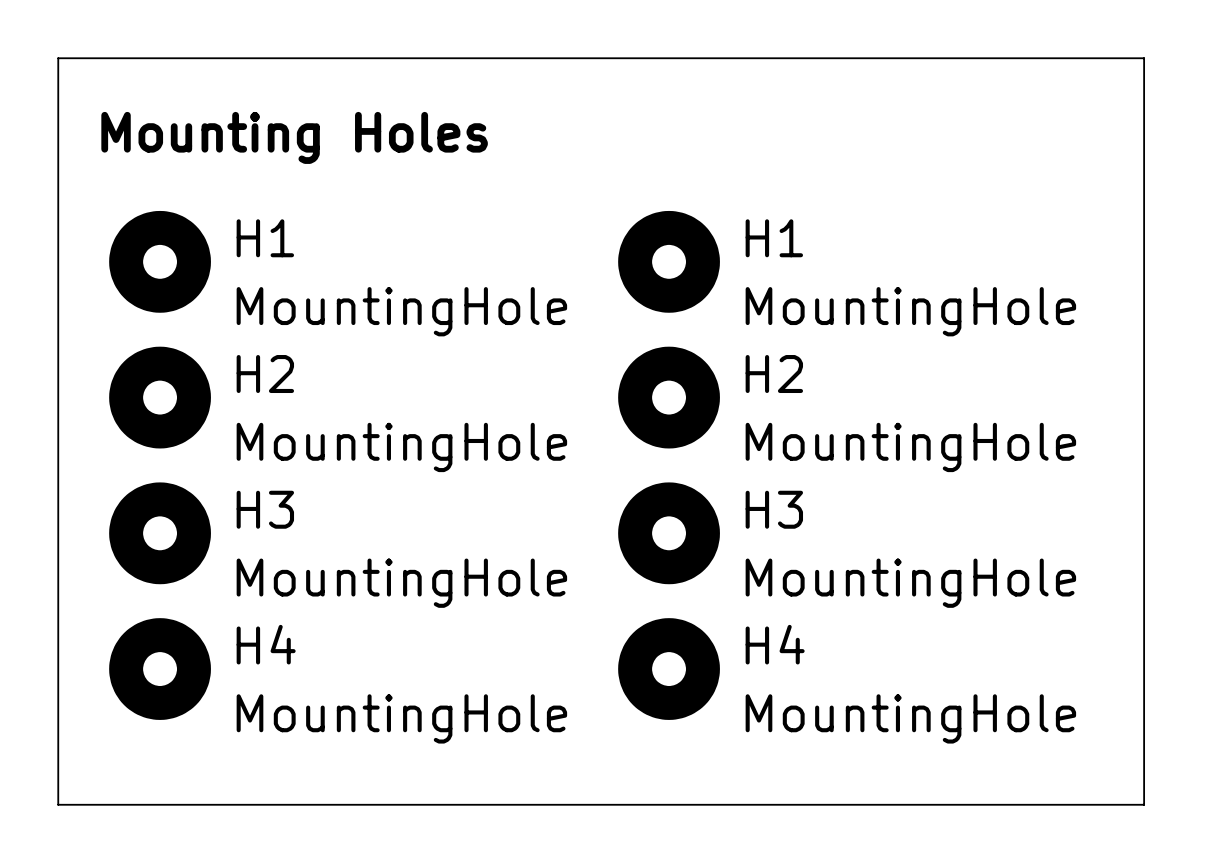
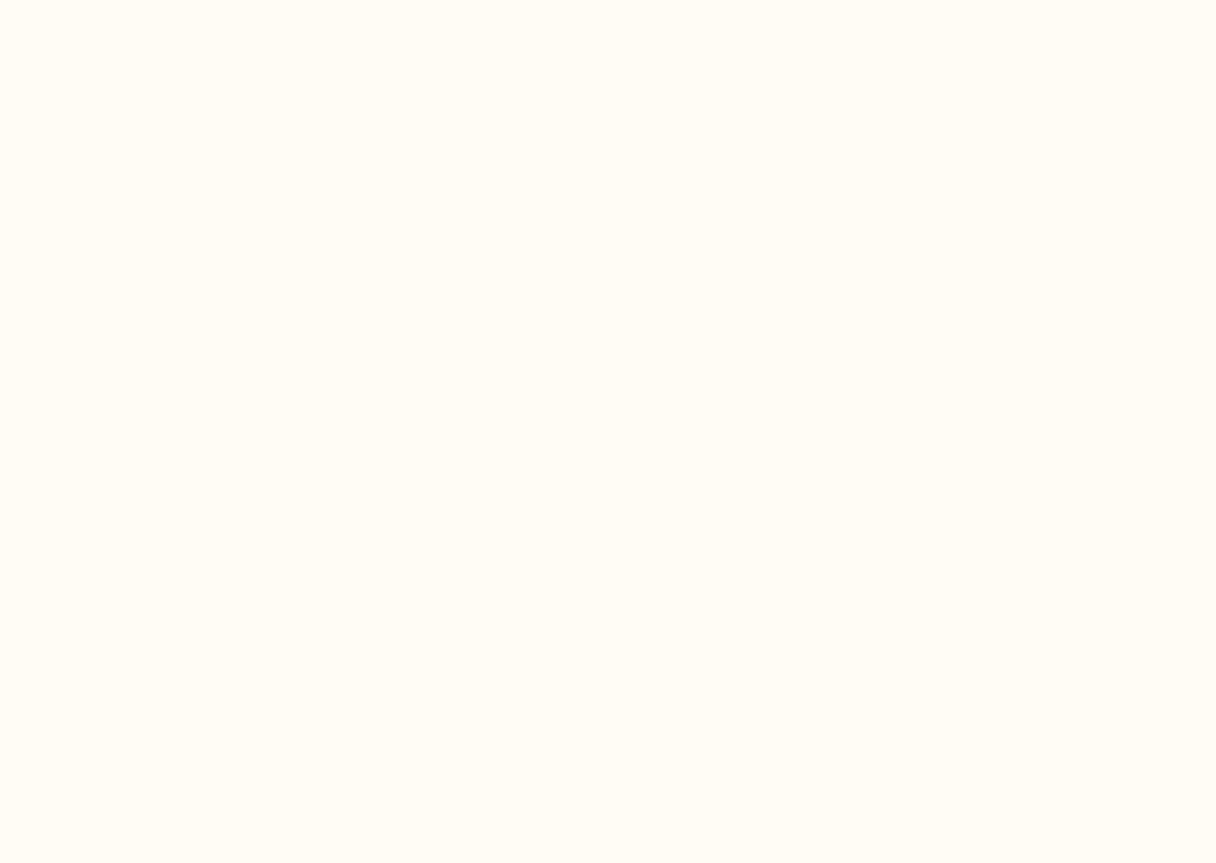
line: (58, 58) (1144, 58) (1144, 804) (58, 804) (58, 58) -> none
text: Mounting Holes (294, 137) -> none
H1: MountingHole (160, 261) -> none
H1: MountingHole (669, 261) -> none
H2: MountingHole (160, 397) -> none
H2: MountingHole (669, 397) -> none
H3: MountingHole (160, 533) -> none
H3: MountingHole (669, 533) -> none
H4: MountingHole (160, 669) -> none
H4: MountingHole (669, 669) -> none

